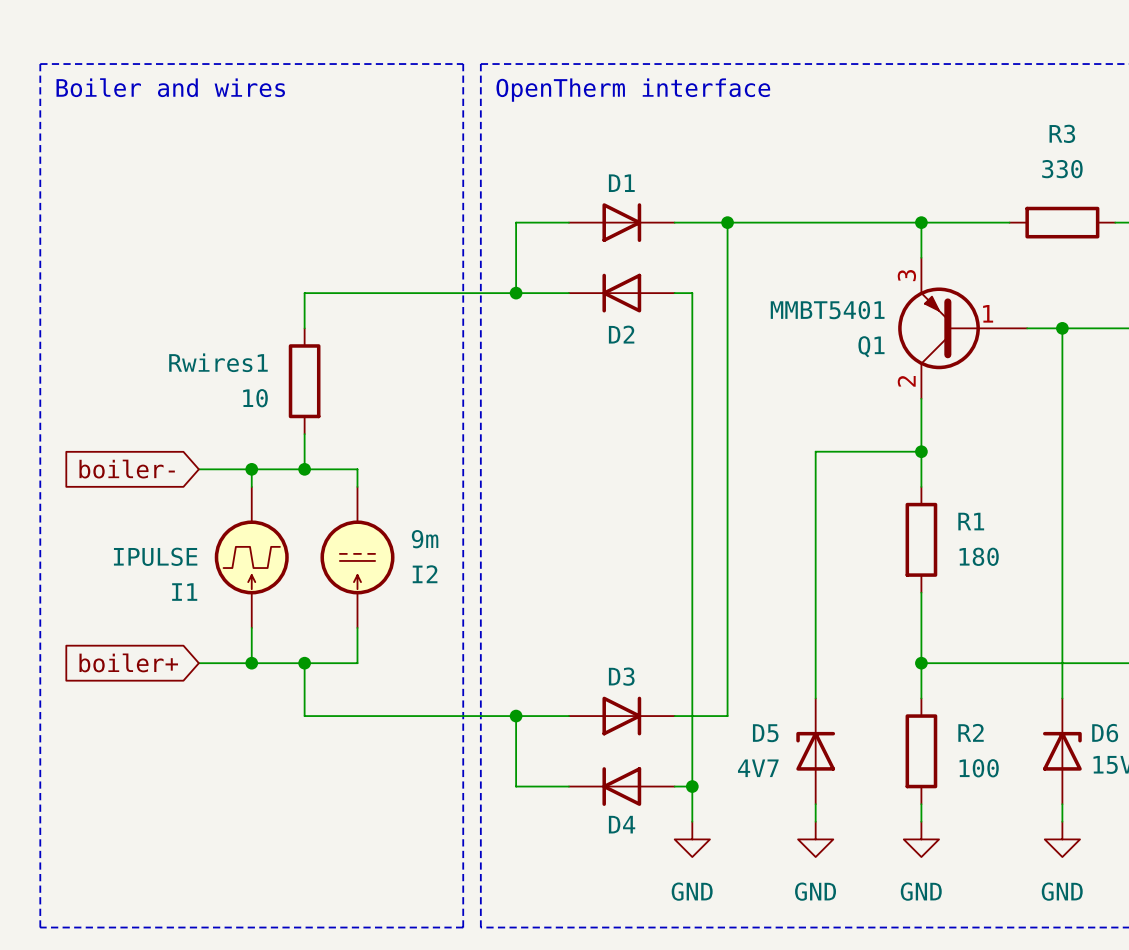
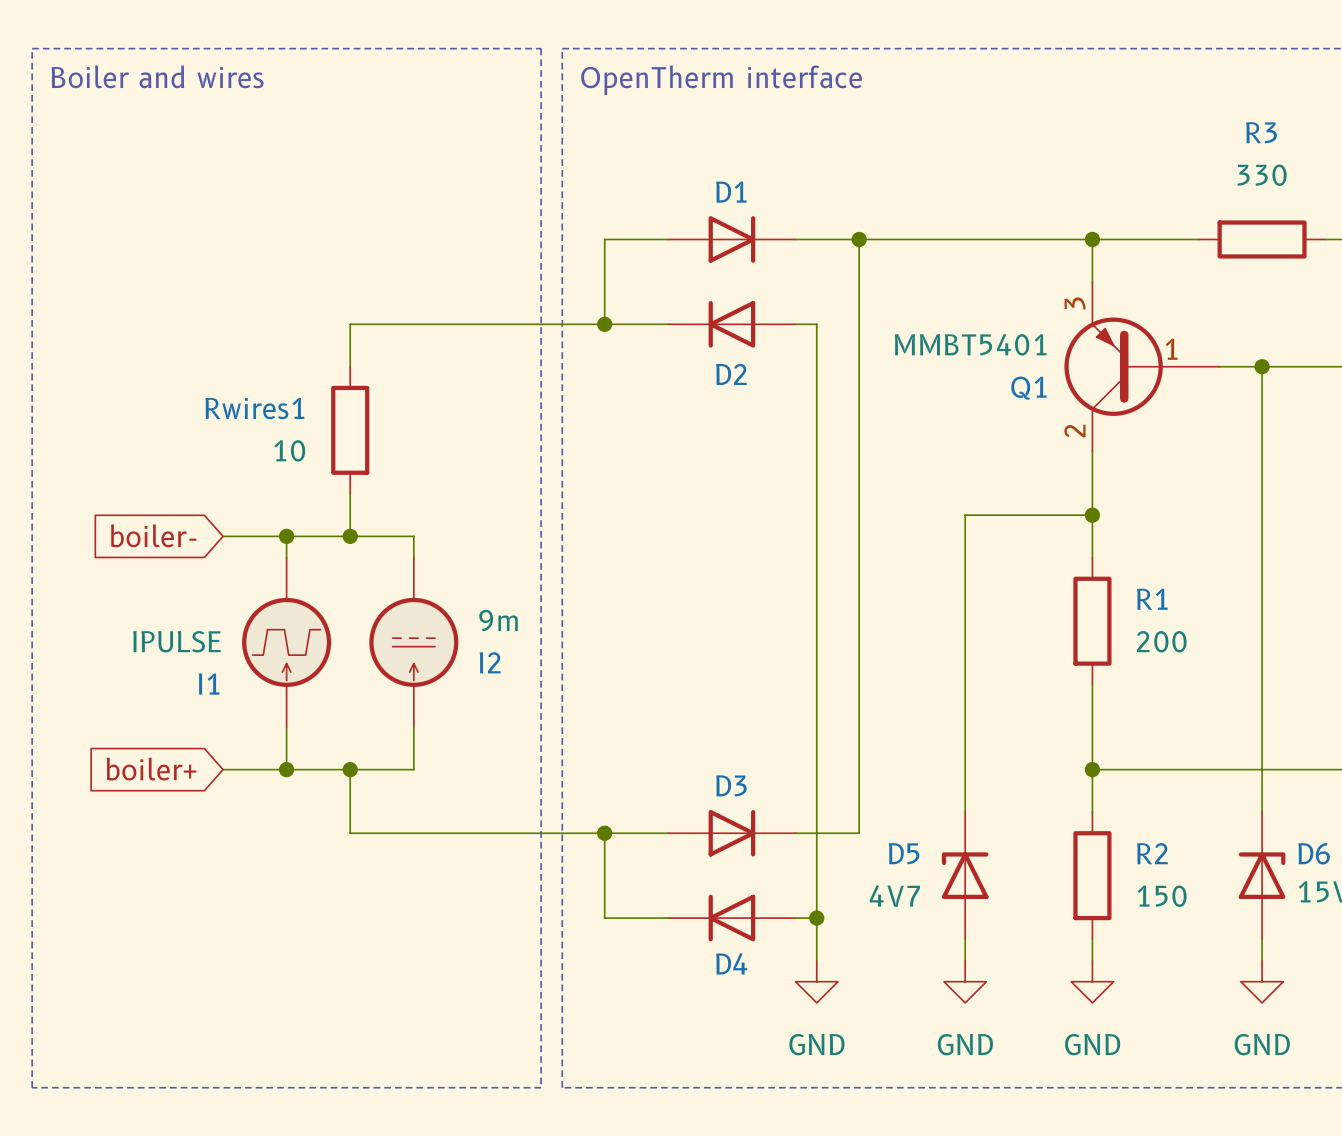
R1 value: 180 (979, 556) -> 200 (1161, 641)
R2 value: 100 (979, 768) -> 150 (1162, 896)

